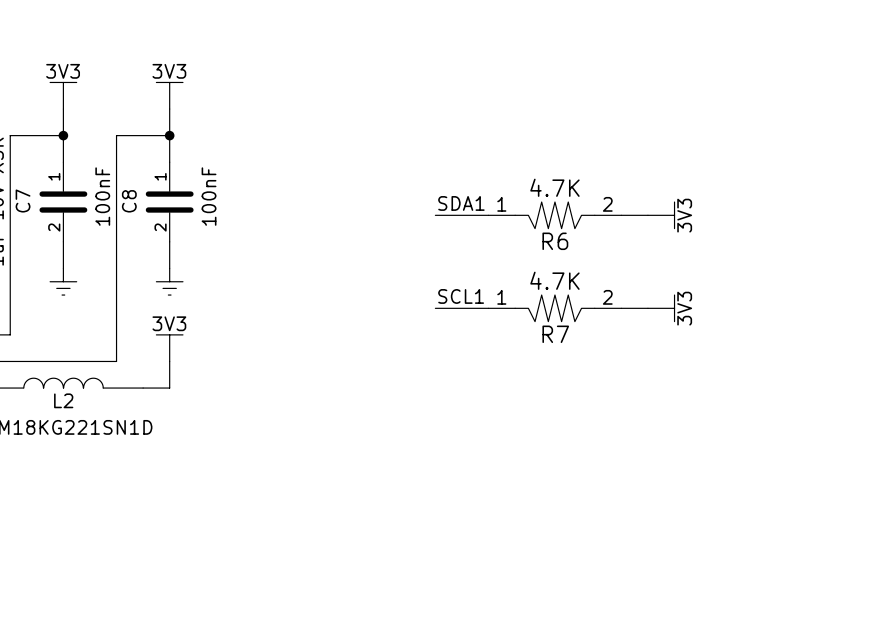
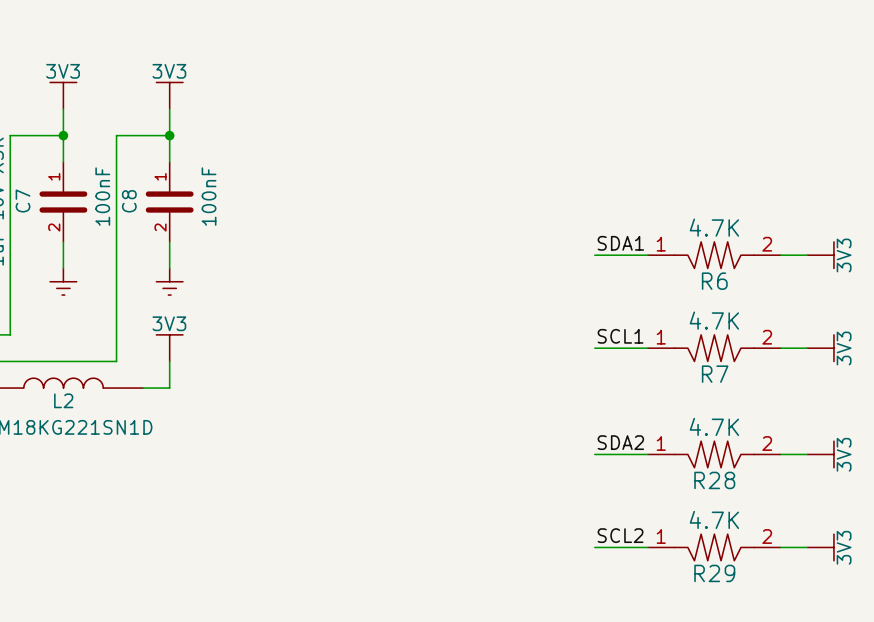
label position: SDA1 (461, 203) -> SDA1 (620, 243)
wire: (435, 215) (488, 215) -> (594, 255) (647, 255)
R6 position: (554, 215) -> (714, 255)
wire: (621, 215) (647, 215) -> (780, 255) (807, 255)
power symbol: 3V3 (661, 215) -> none
power symbol: none -> 3V3 (820, 255)
label position: SCL1 (461, 296) -> SCL1 (620, 336)
wire: (435, 308) (488, 308) -> (594, 348) (647, 348)
R7 position: (554, 308) -> (714, 348)
wire: (621, 308) (647, 308) -> (780, 348) (807, 348)
power symbol: 3V3 (661, 308) -> none
power symbol: none -> 3V3 (820, 348)
label: none -> SDA2 (620, 442)
wire: none -> (594, 454) (647, 454)
R28: none -> 4.7K (714, 454)
wire: none -> (780, 454) (807, 454)
power symbol: none -> 3V3 (820, 454)
label: none -> SCL2 (620, 535)
wire: none -> (594, 547) (647, 547)
R29: none -> 4.7K (714, 547)
wire: none -> (780, 547) (807, 547)
power symbol: none -> 3V3 (820, 547)

